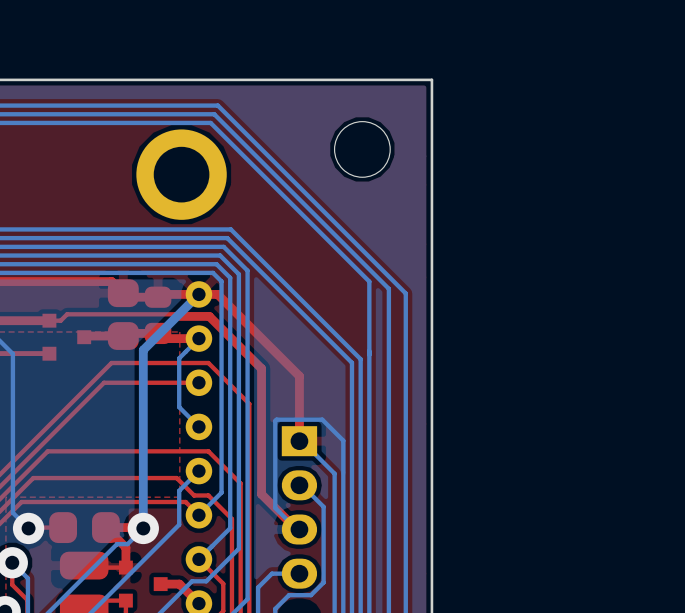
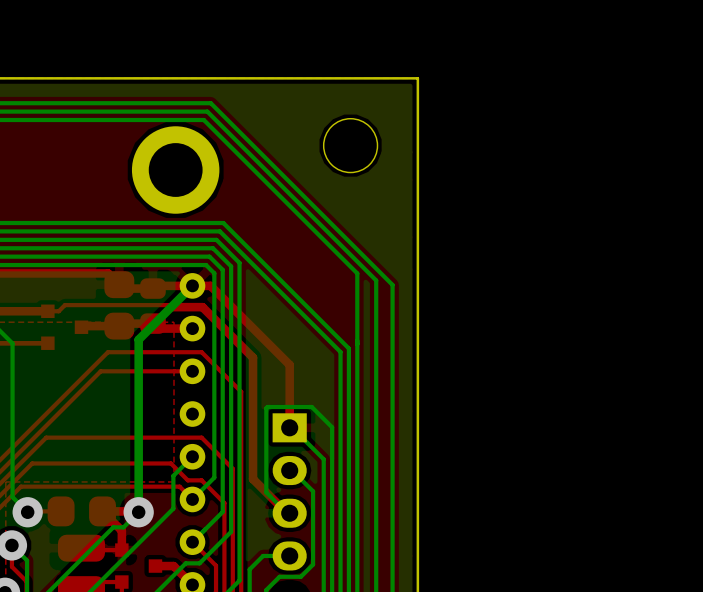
bottom track: (198, 338) (179, 358) (179, 407) (198, 426) -> none

